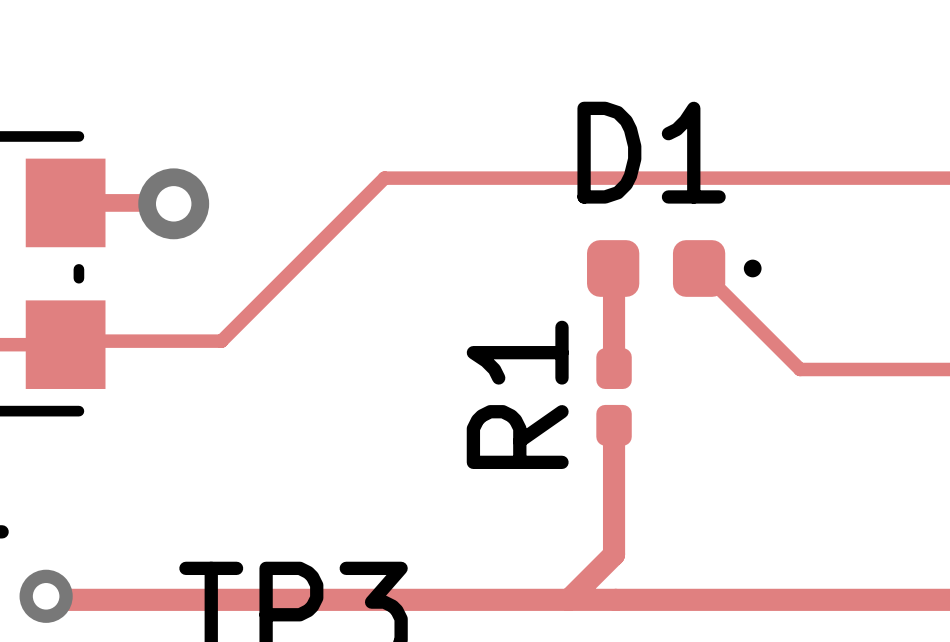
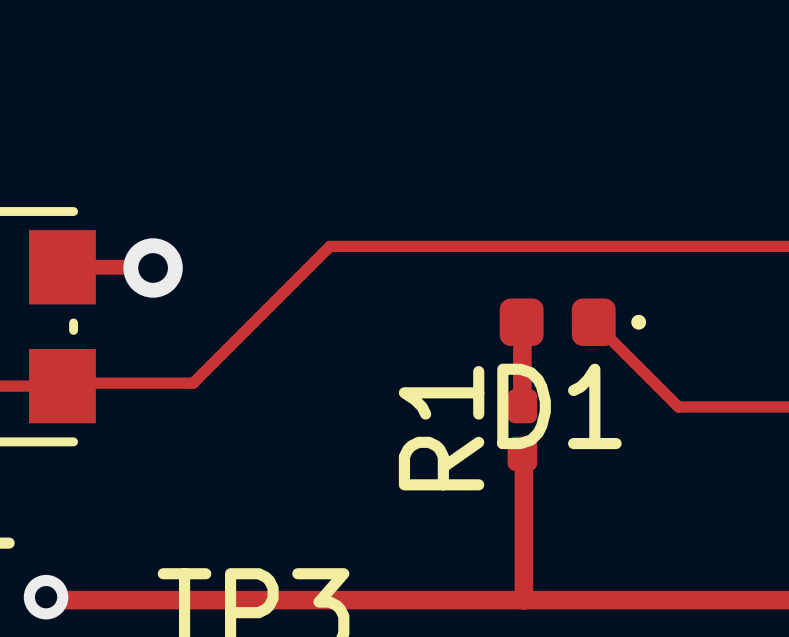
D1 name position: D1 (651, 152) -> D1 (559, 406)
track: none -> (522, 453) (523, 600)
track: (609, 429) (614, 425) (614, 554) (568, 599) -> none

